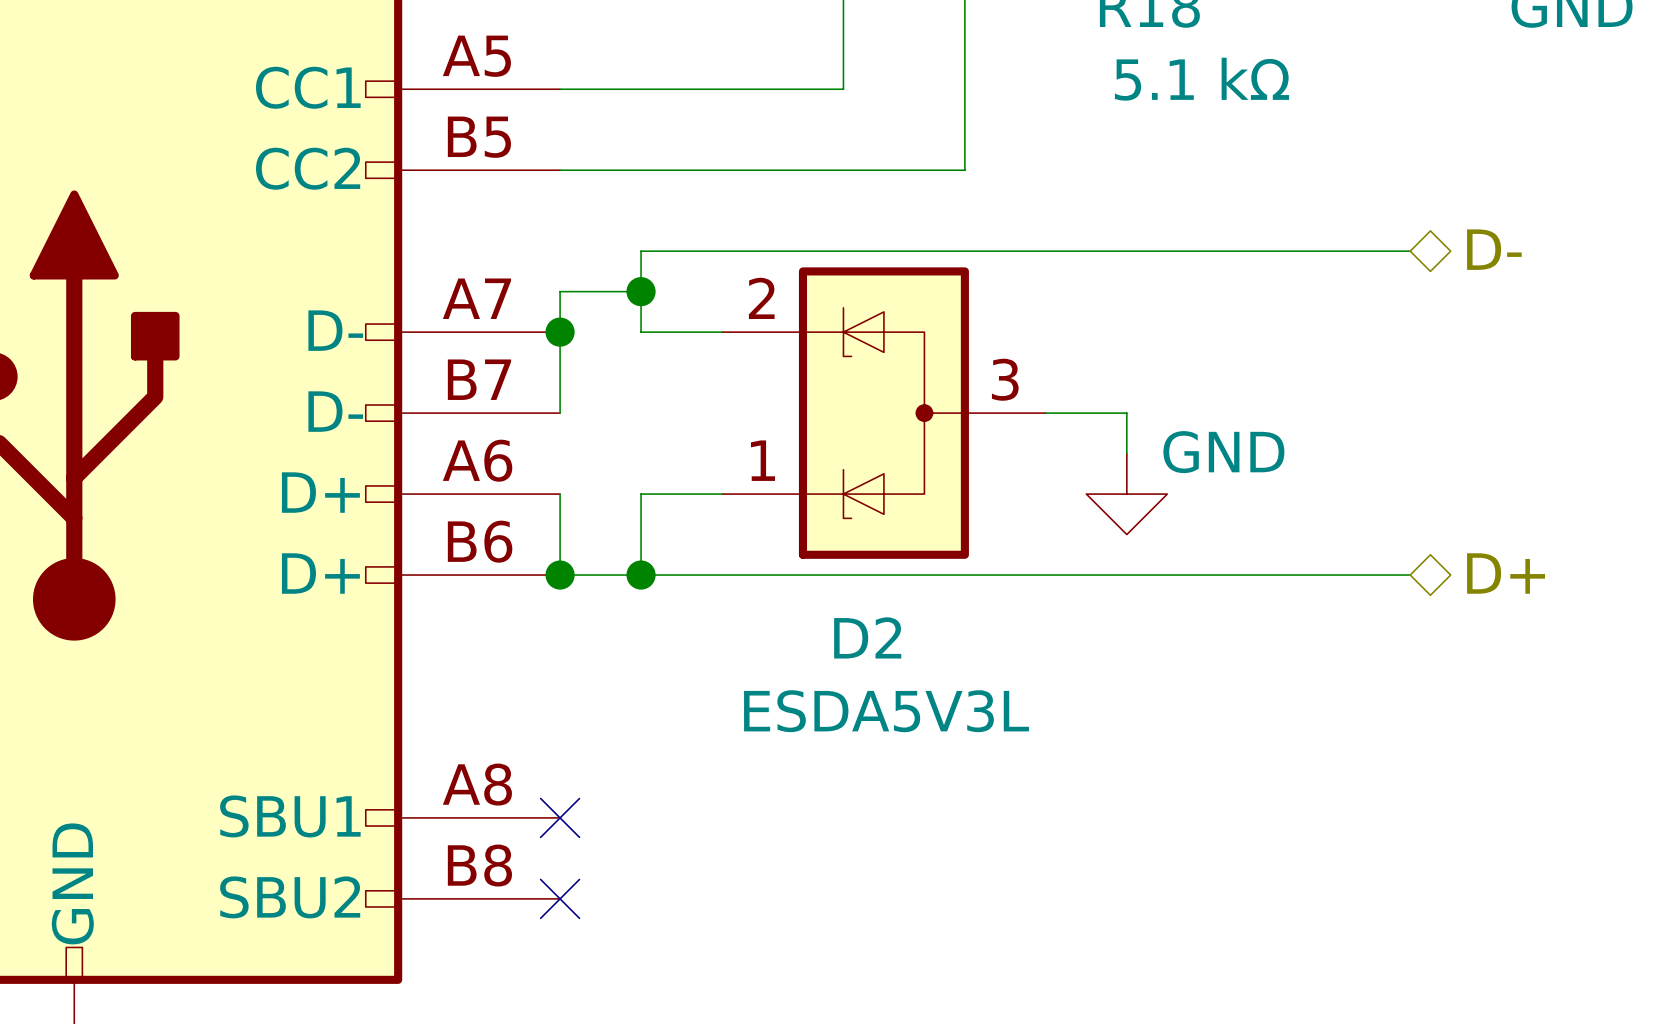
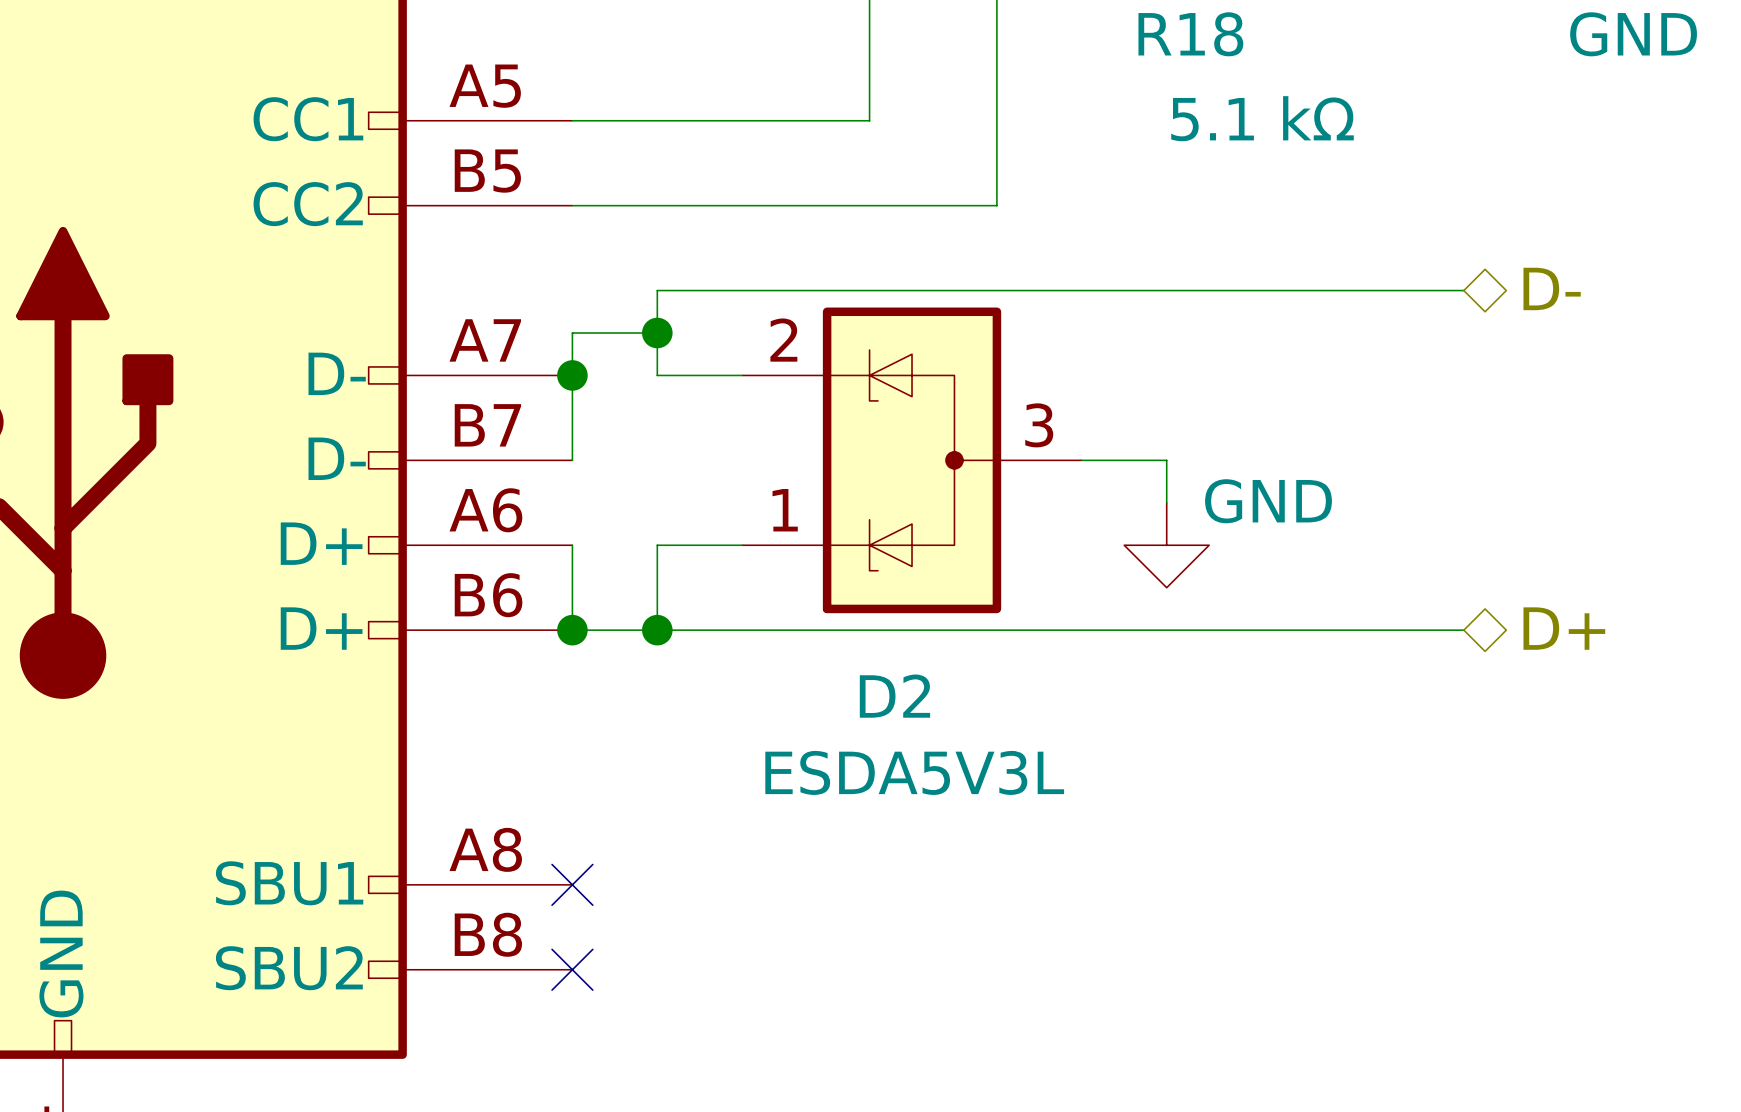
R18 value position: 5.1 kΩ (1201, 79) -> 5.1 kΩ (1262, 118)

